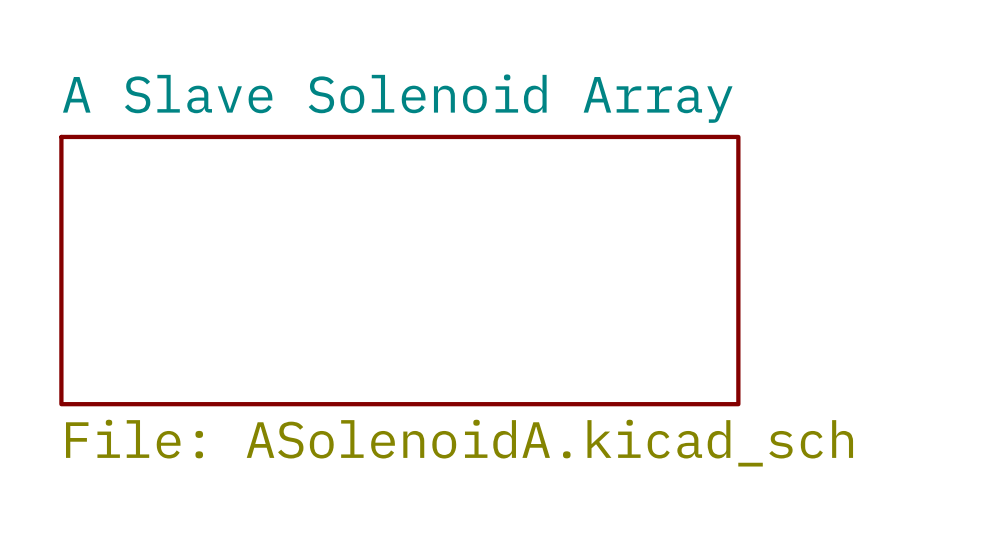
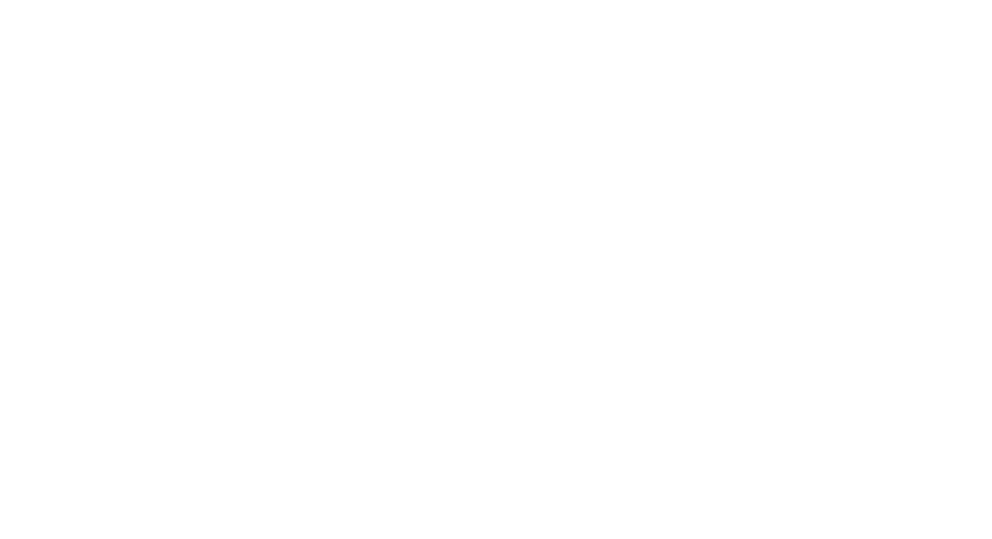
sheet A Slave Solenoid Array: File: ASolenoidA.kicad_sch (399, 270) -> none

